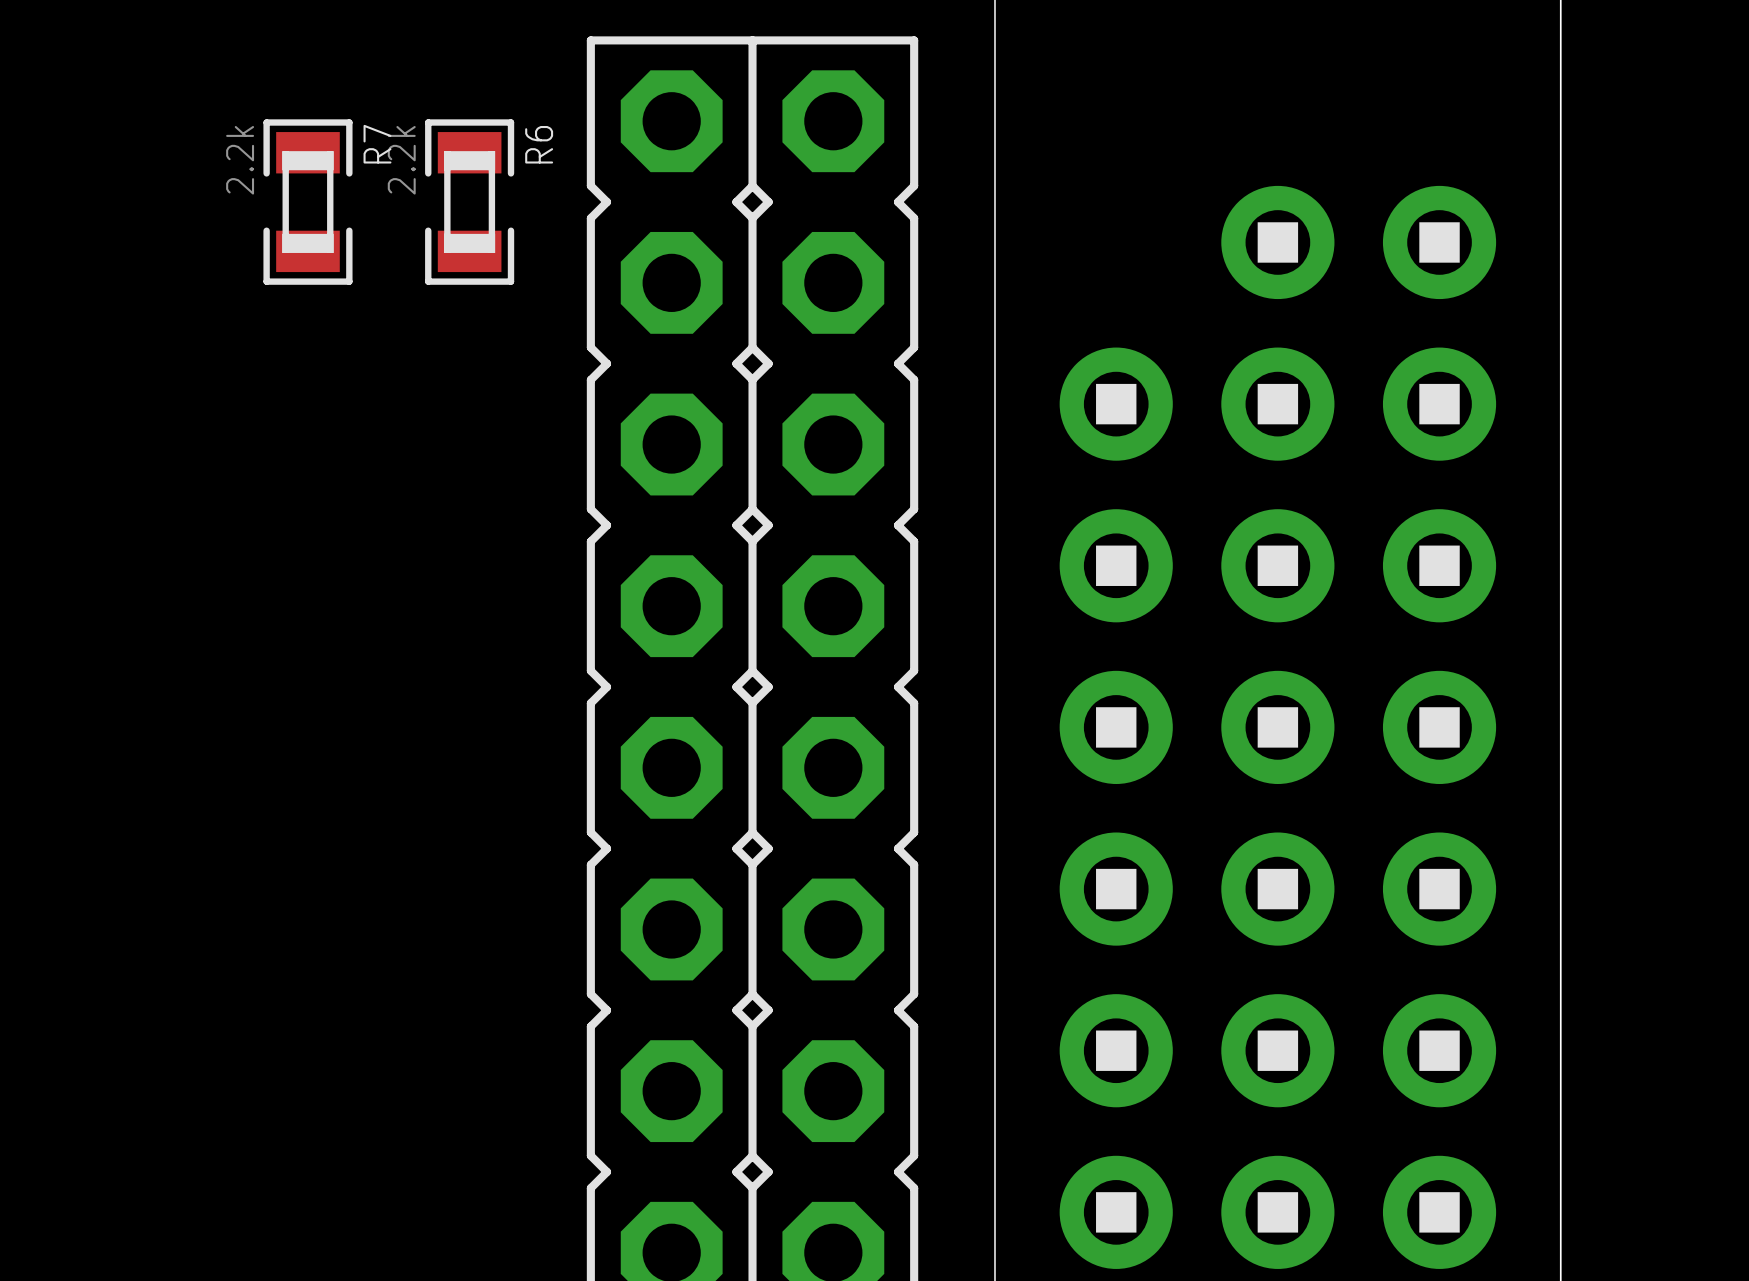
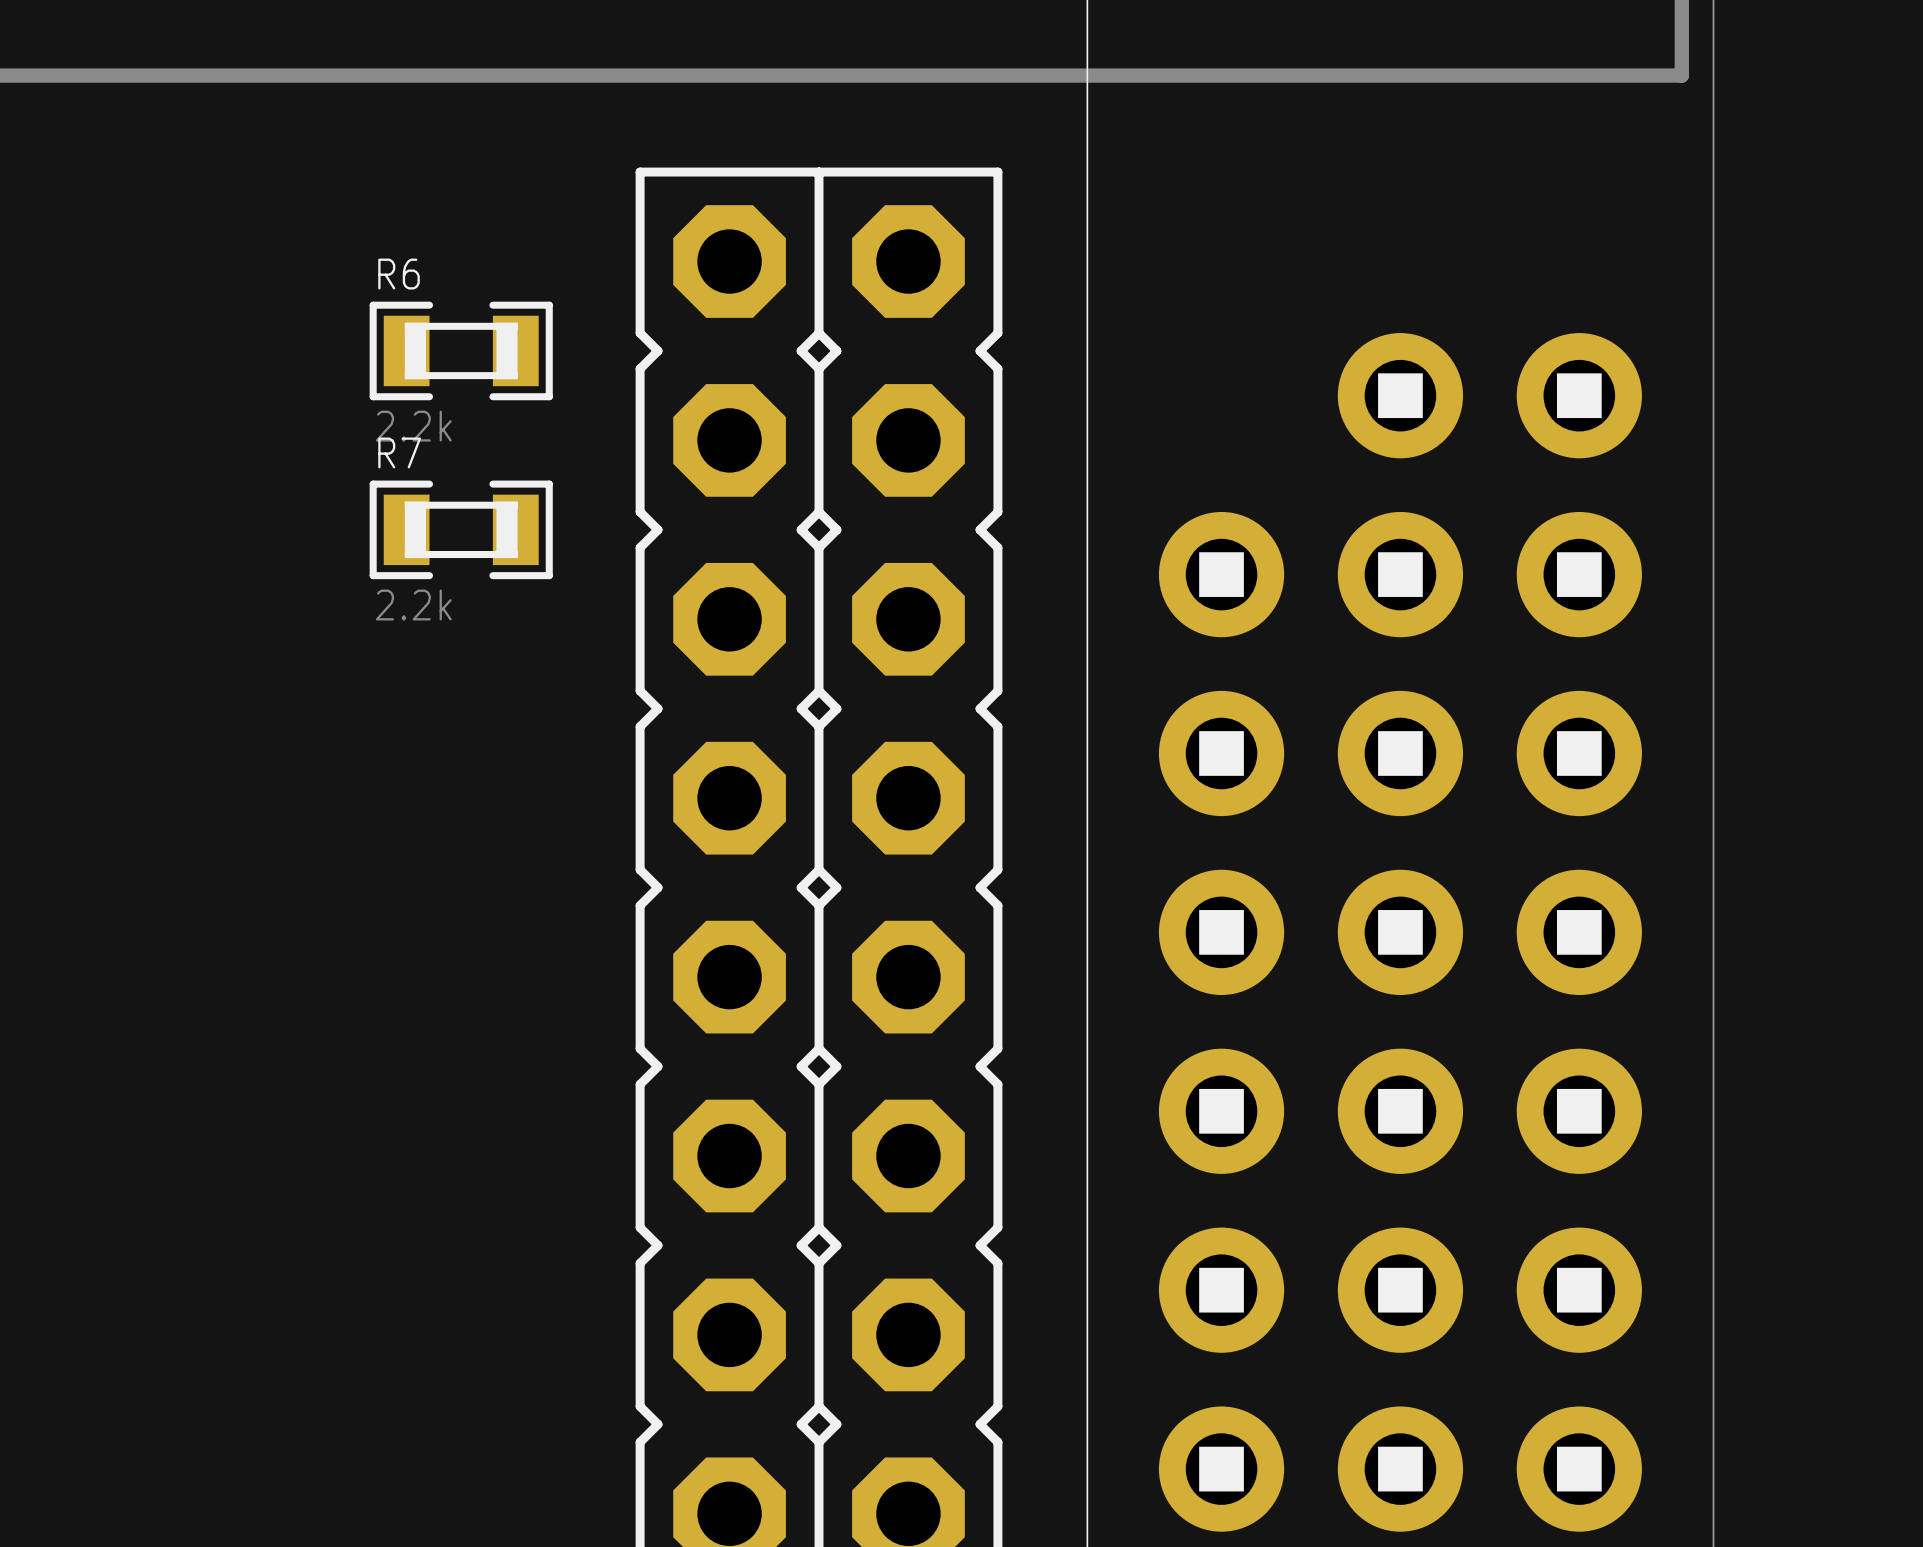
R7 rotation: 0° (307, 202) -> 90° clockwise (461, 529)
R7 position: (307, 202) -> (461, 529)
R6 rotation: 0° (469, 202) -> 90° clockwise (461, 350)

